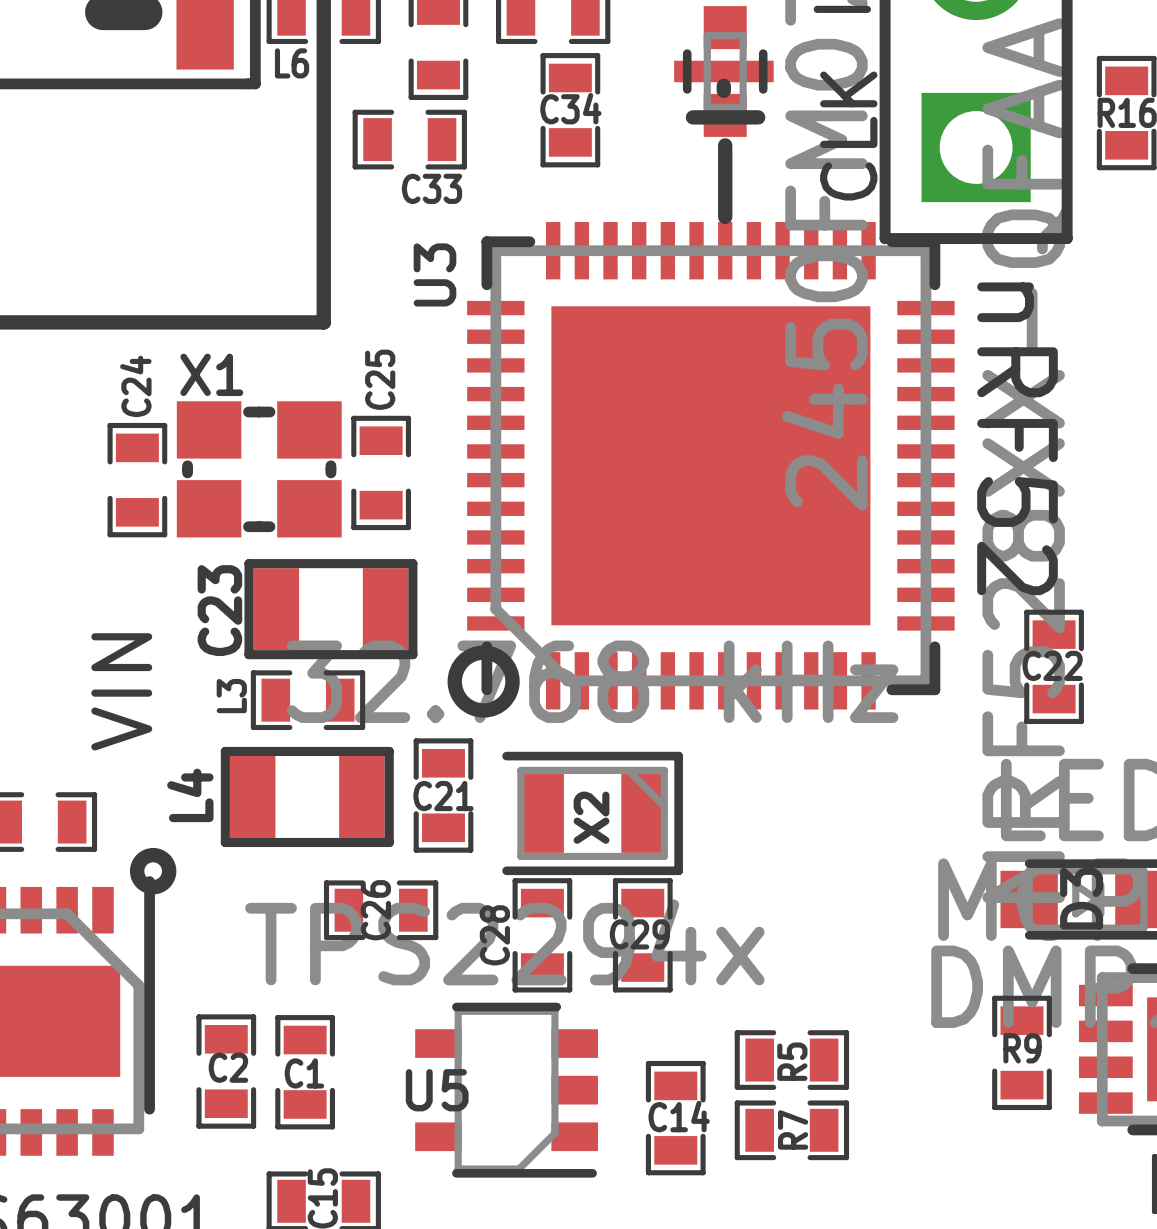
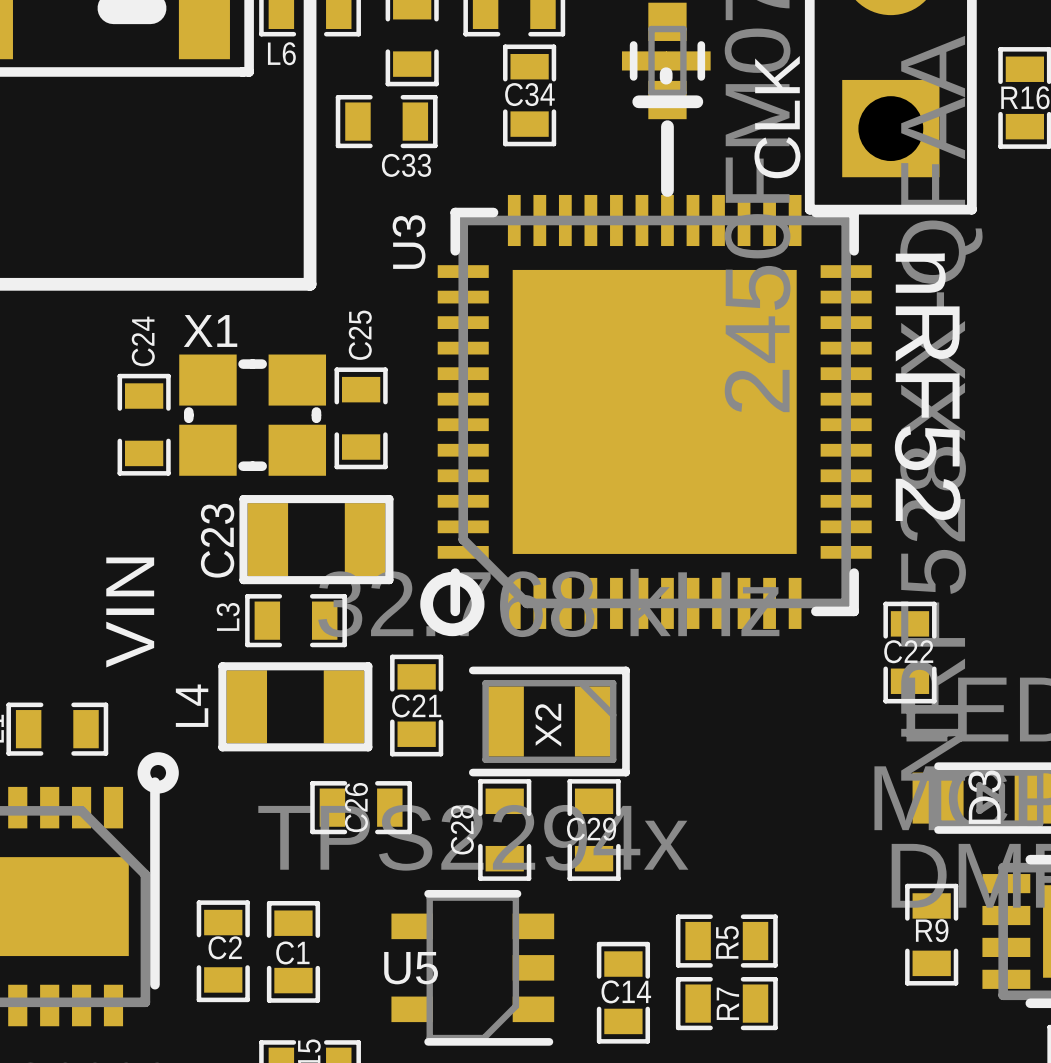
C22 position: (1054, 666) -> (909, 652)

